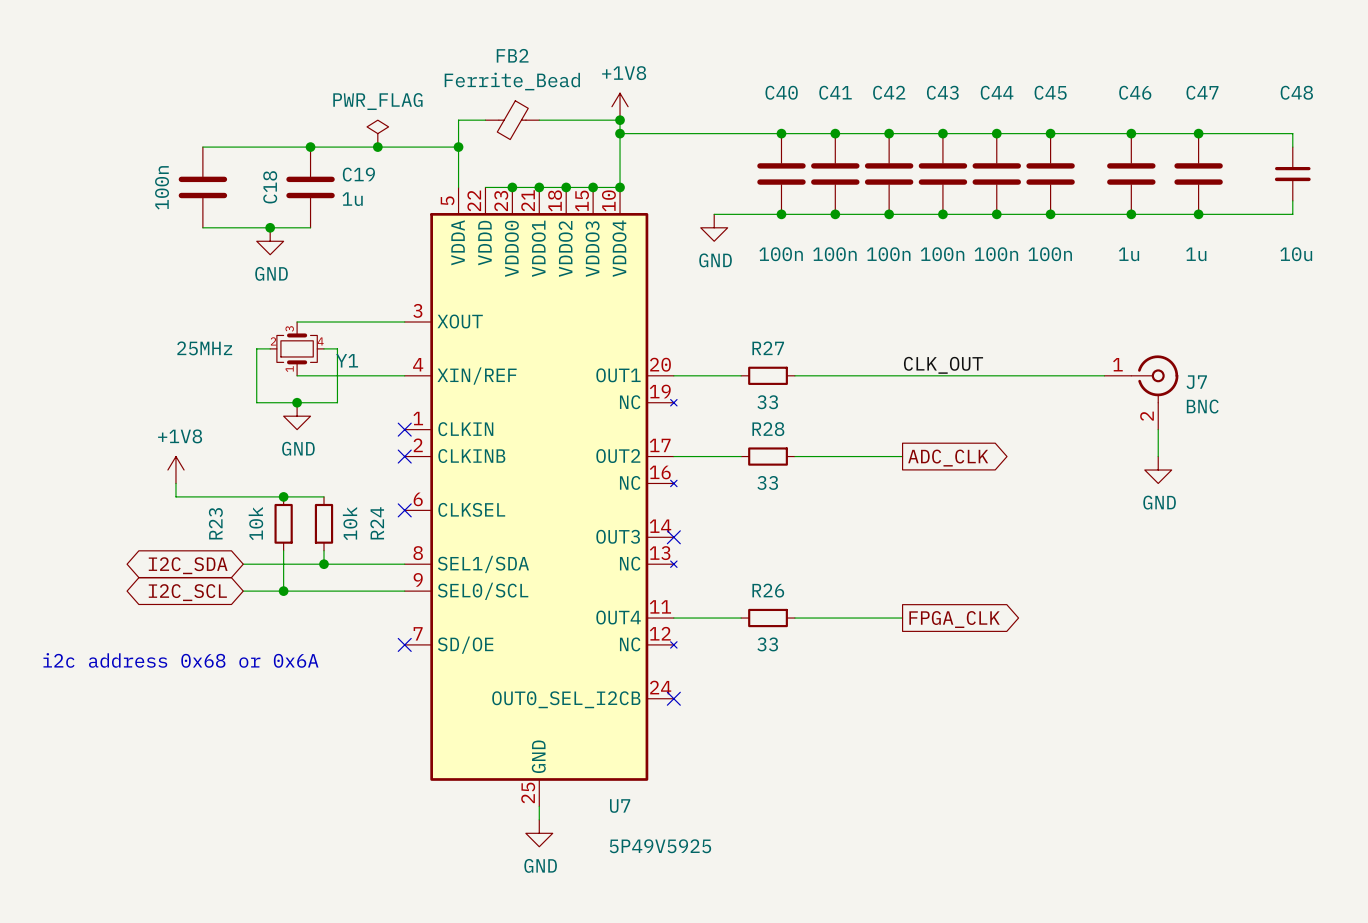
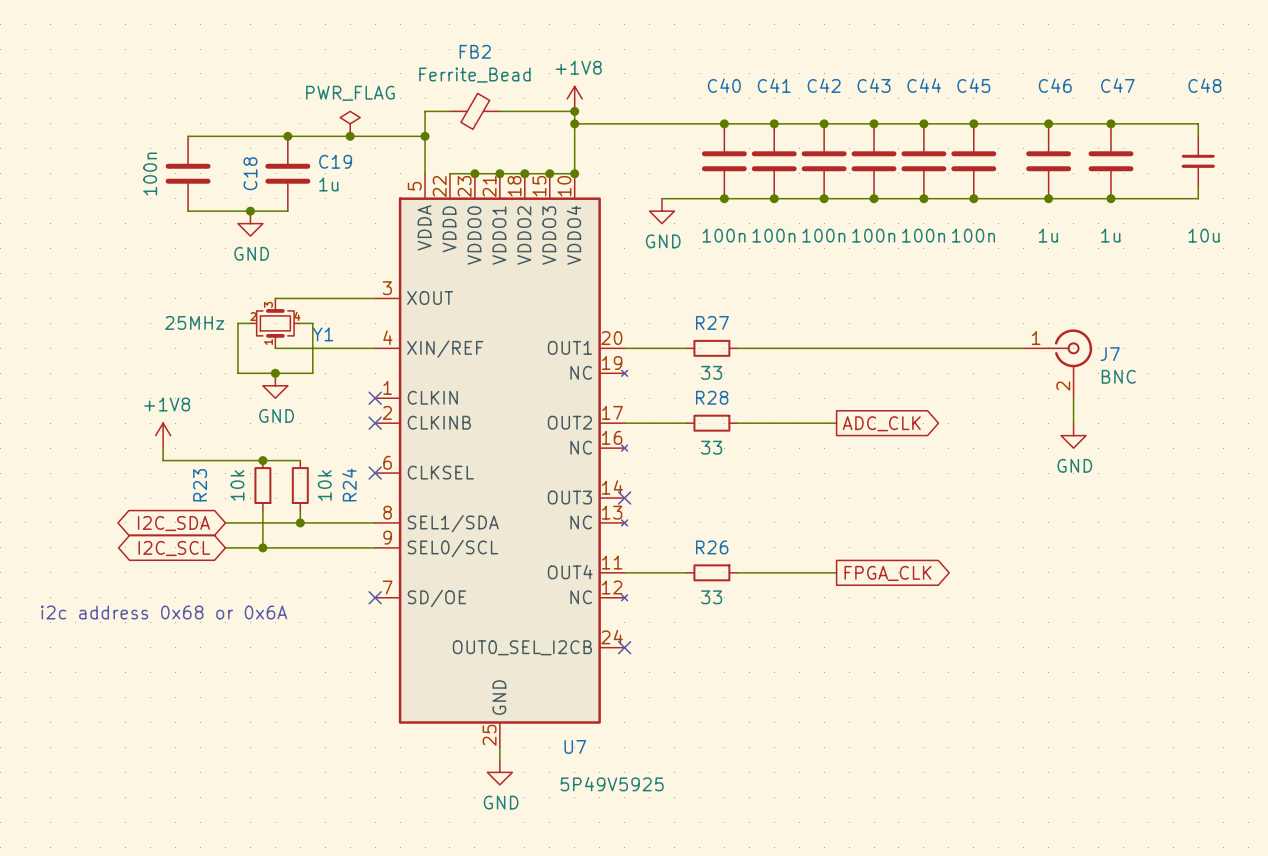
label: CLK_OUT (943, 365) -> none

